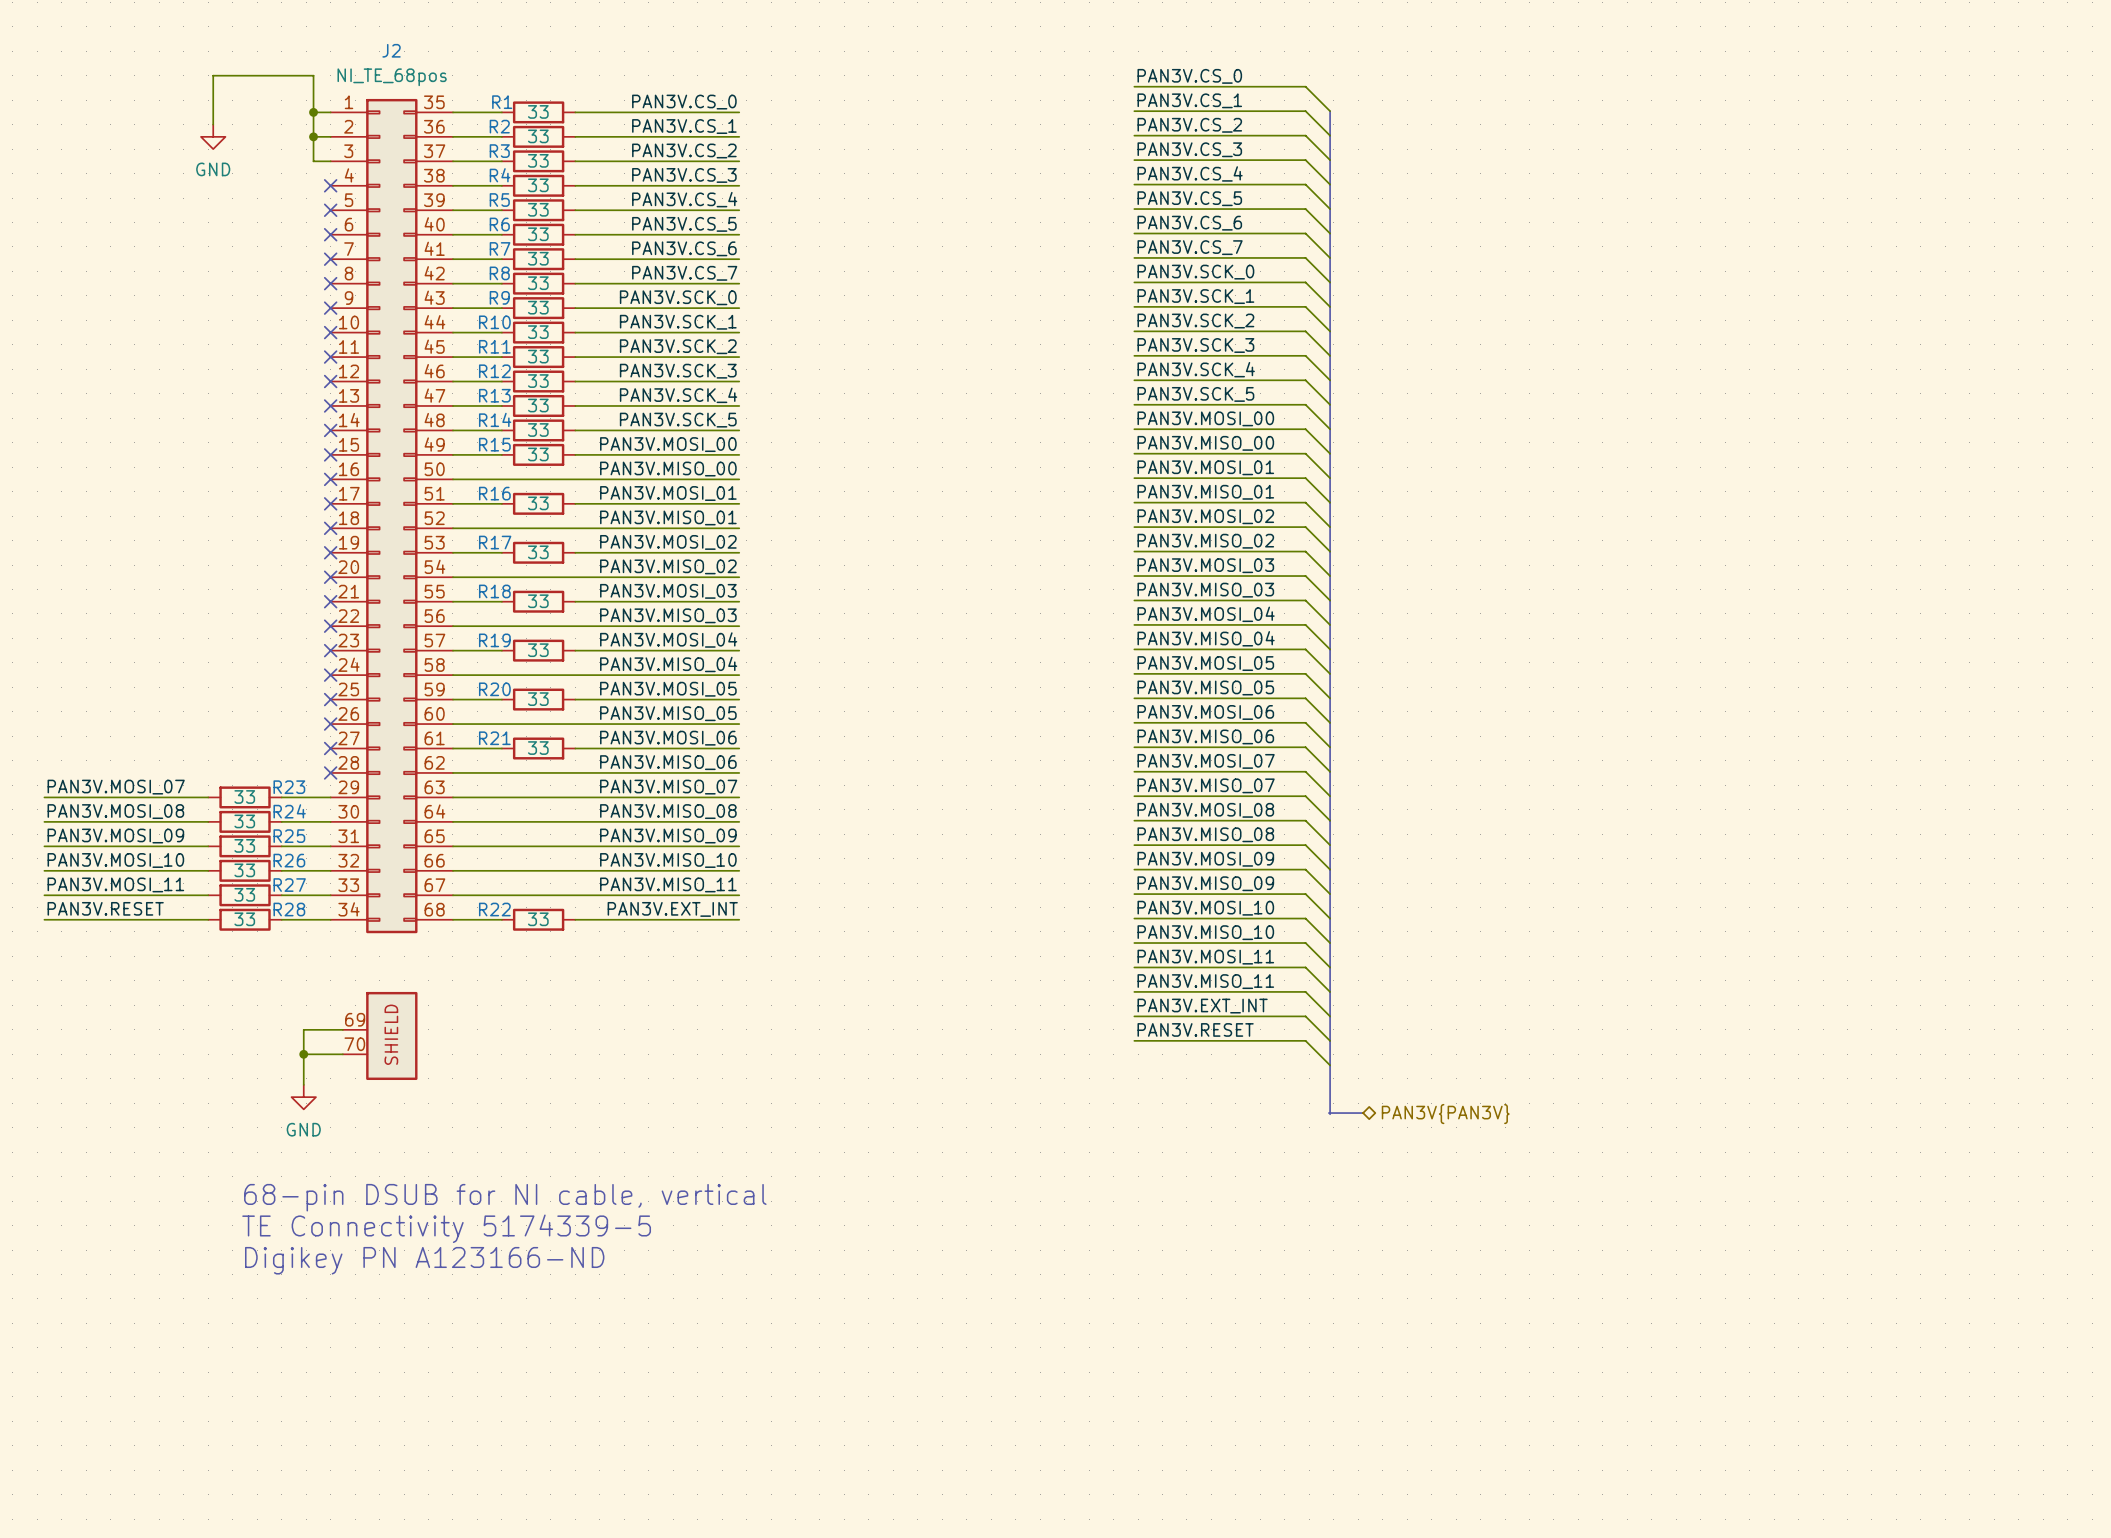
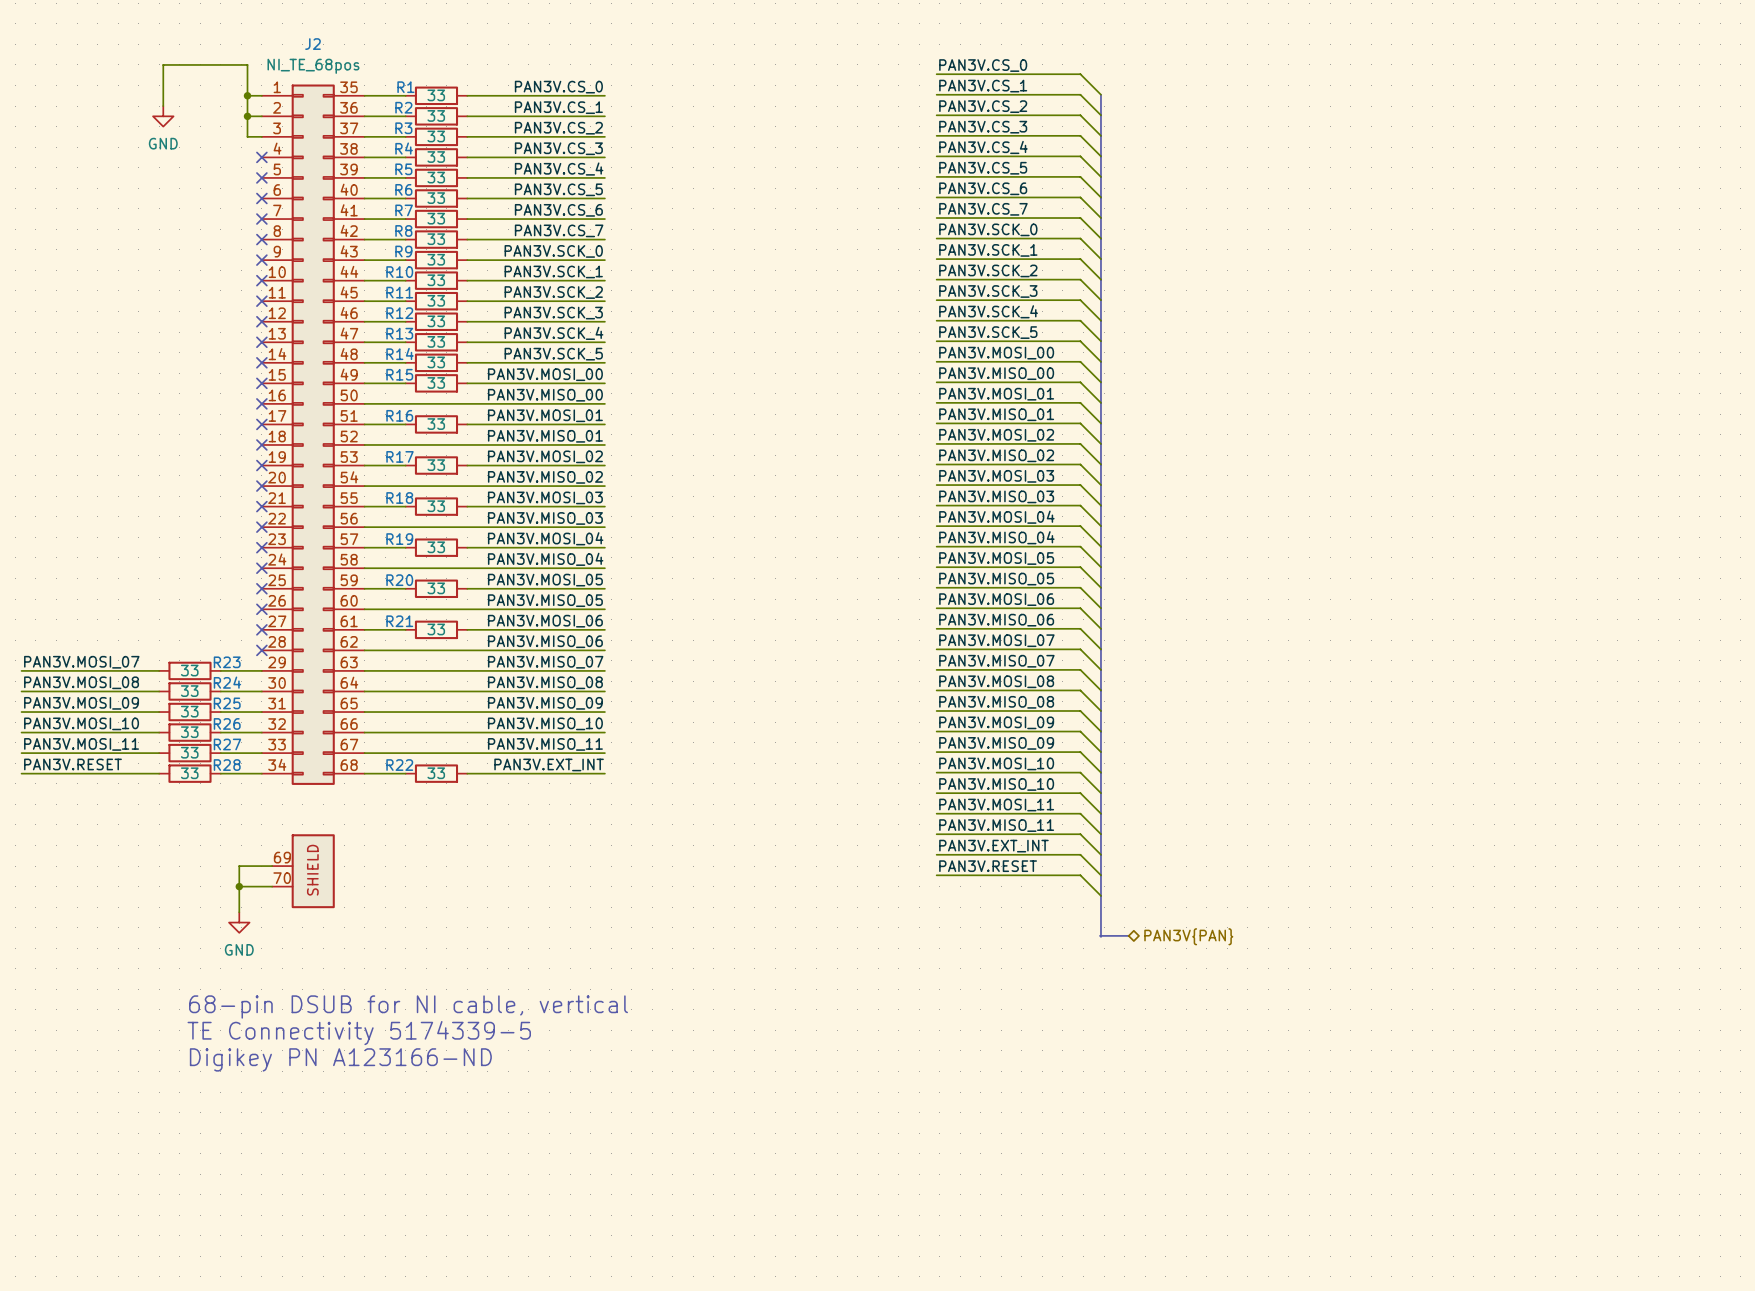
hierarchical label: PAN3V{PAN3V} (1445, 1114) -> PAN3V{PAN} (1188, 936)

